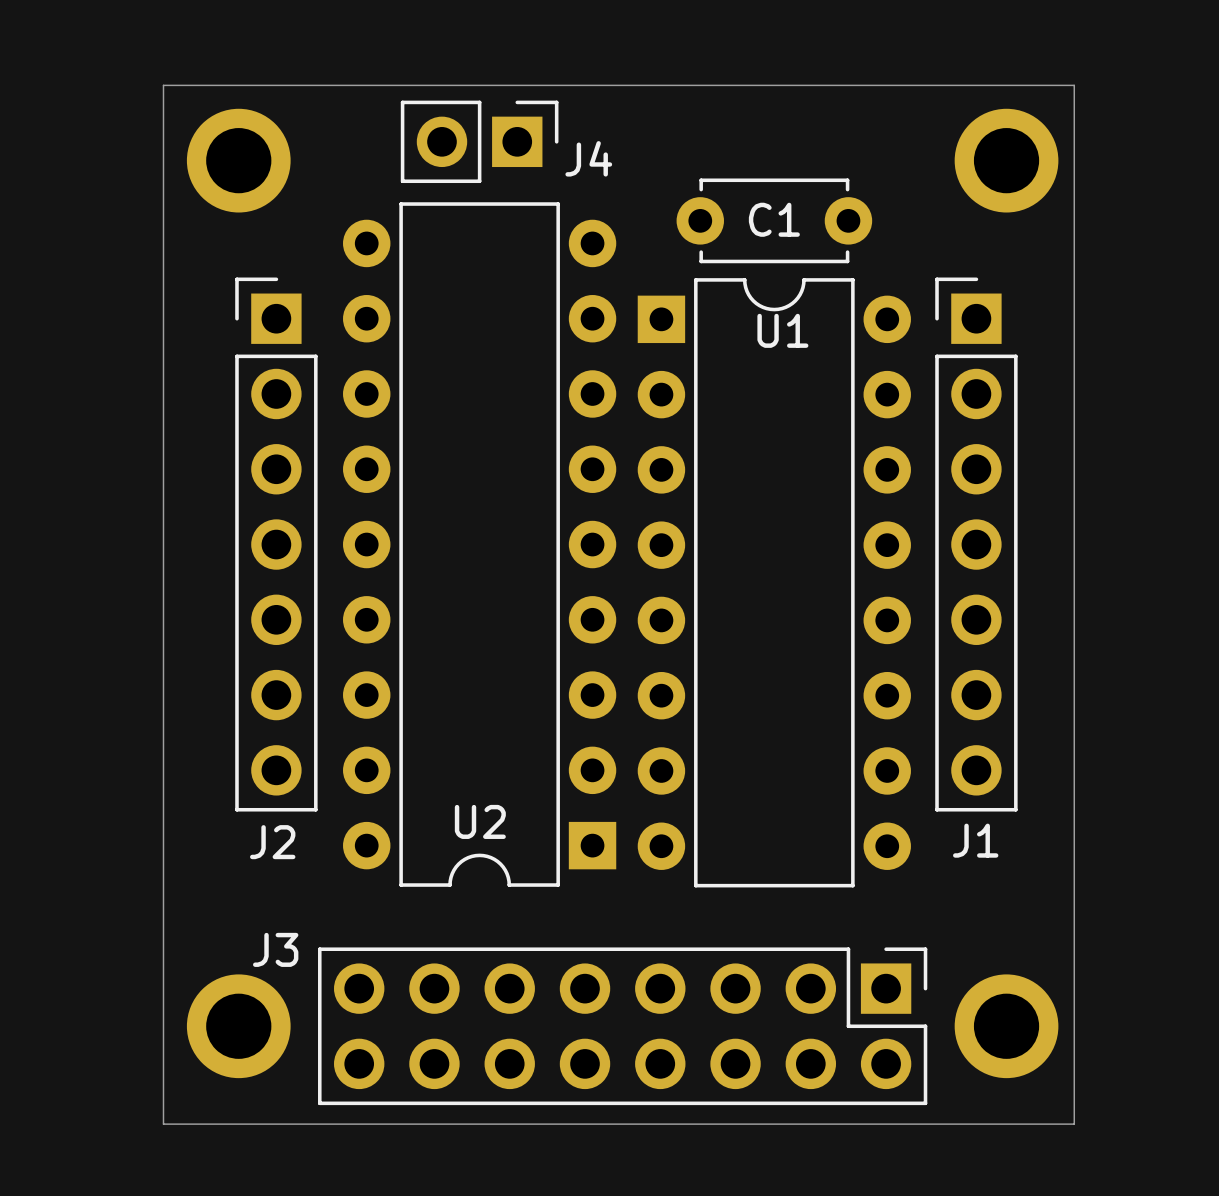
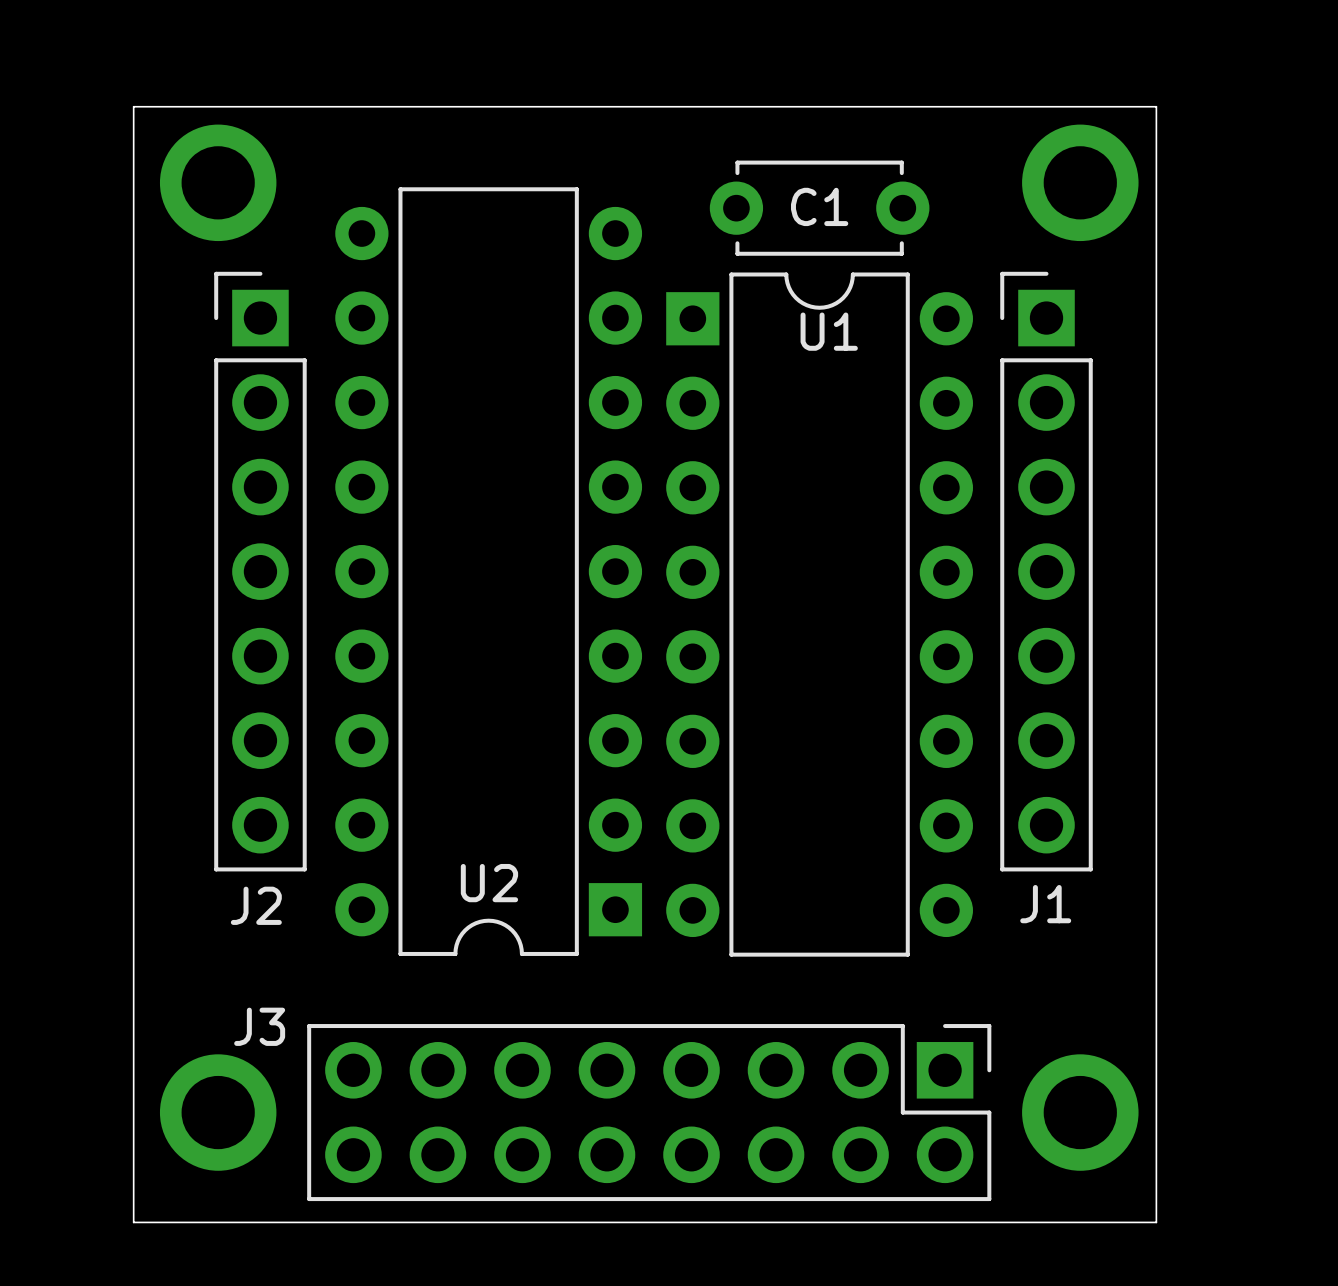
board edge: (163, 130) (163, 85) (1074, 85) (1074, 130) -> (133, 106) (1156, 106)
J4: (479, 141) -> none
part position: (238, 160) -> (218, 182)
part position: (1006, 160) -> (1080, 182)

